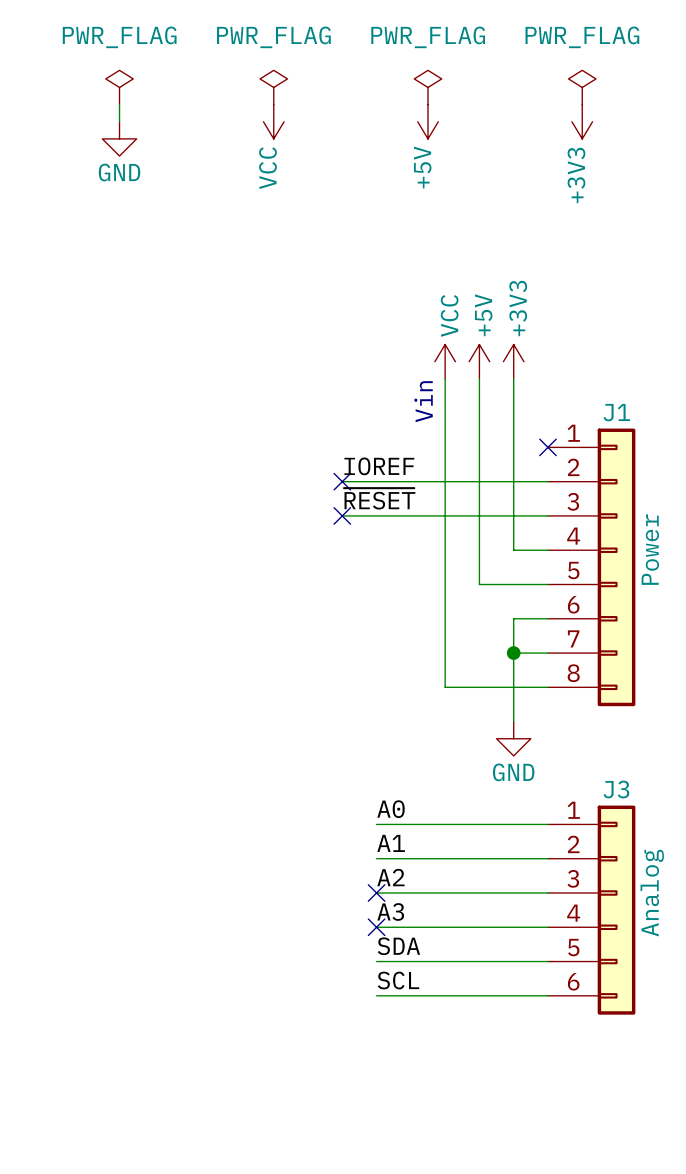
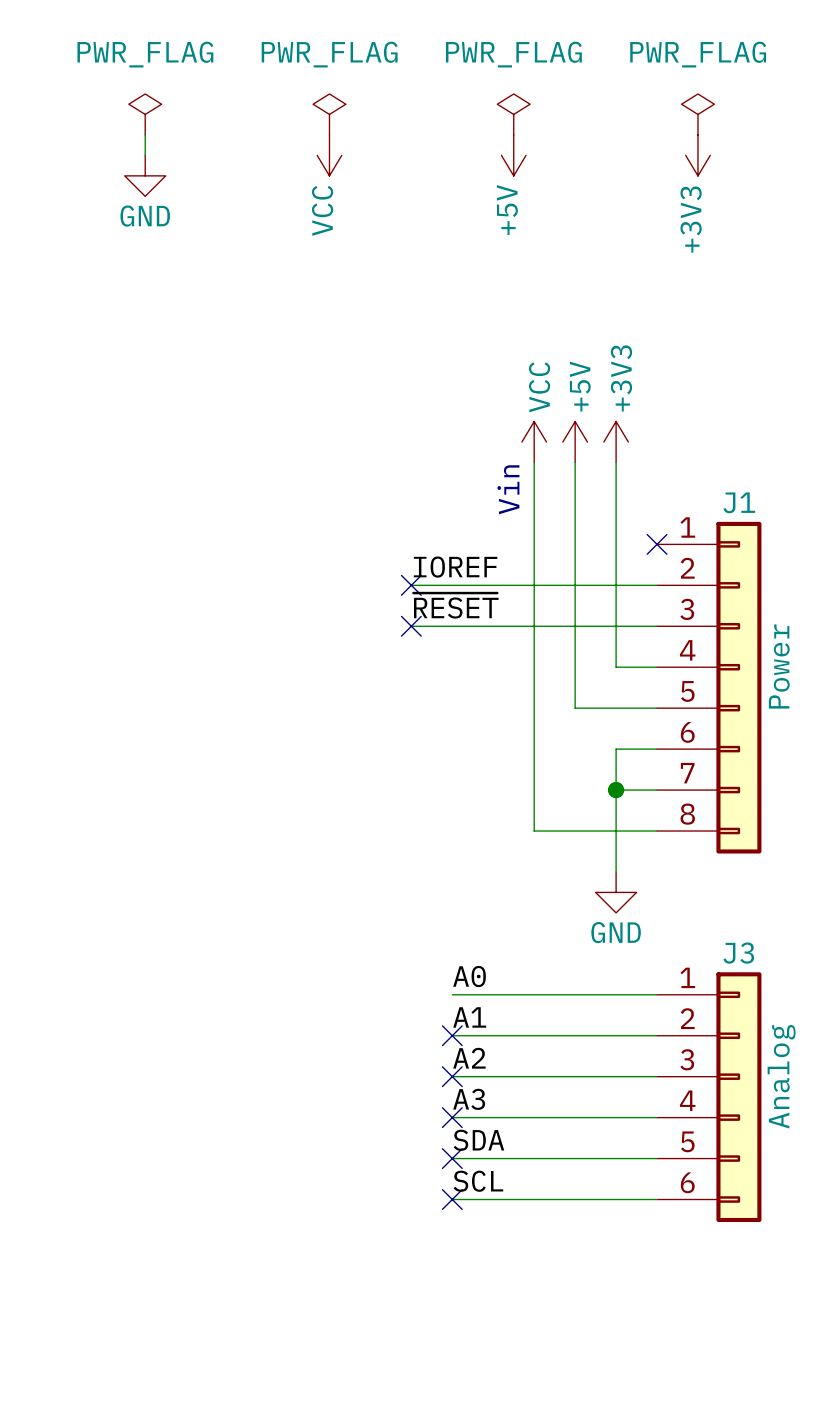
no-connect mark: none -> (452, 1035)
no-connect mark: none -> (452, 1158)
no-connect mark: none -> (452, 1199)

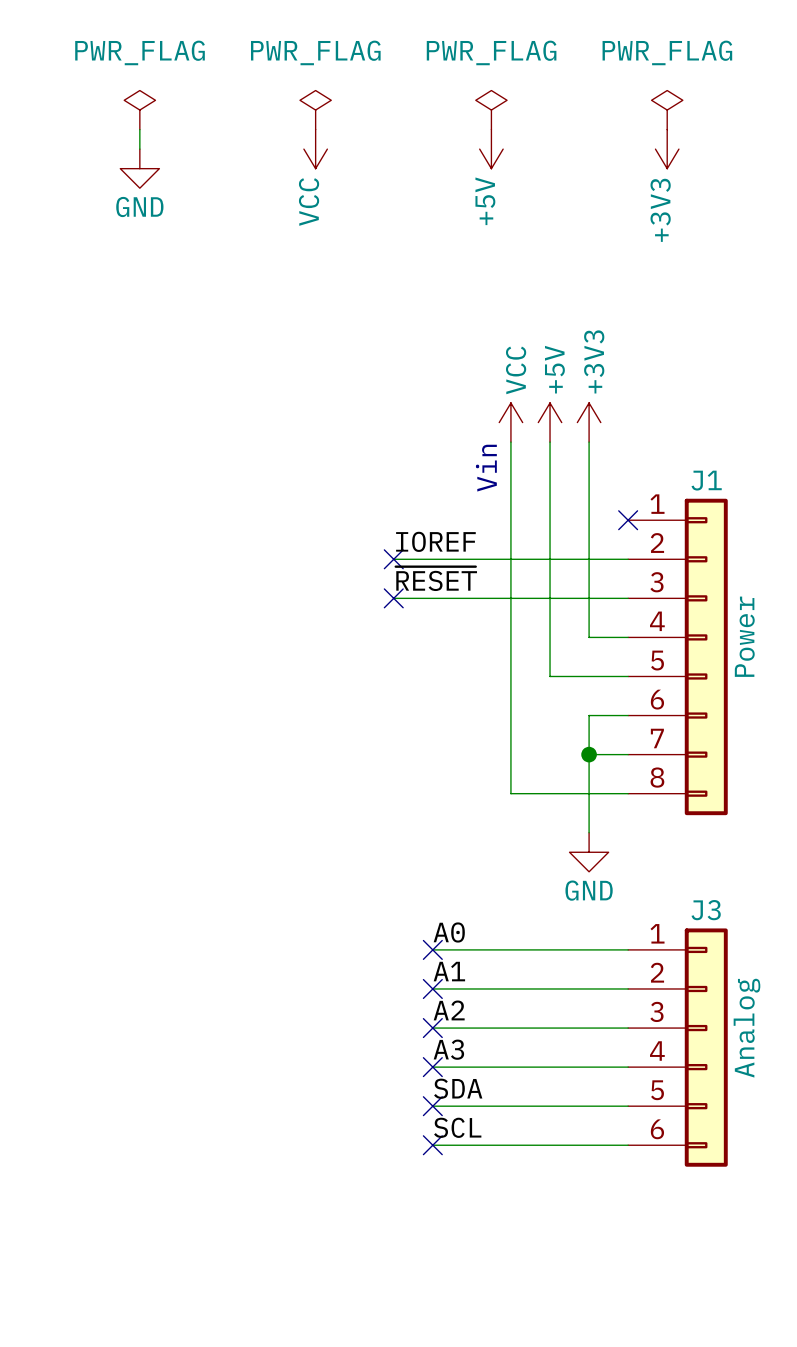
no-connect mark: none -> (432, 949)

